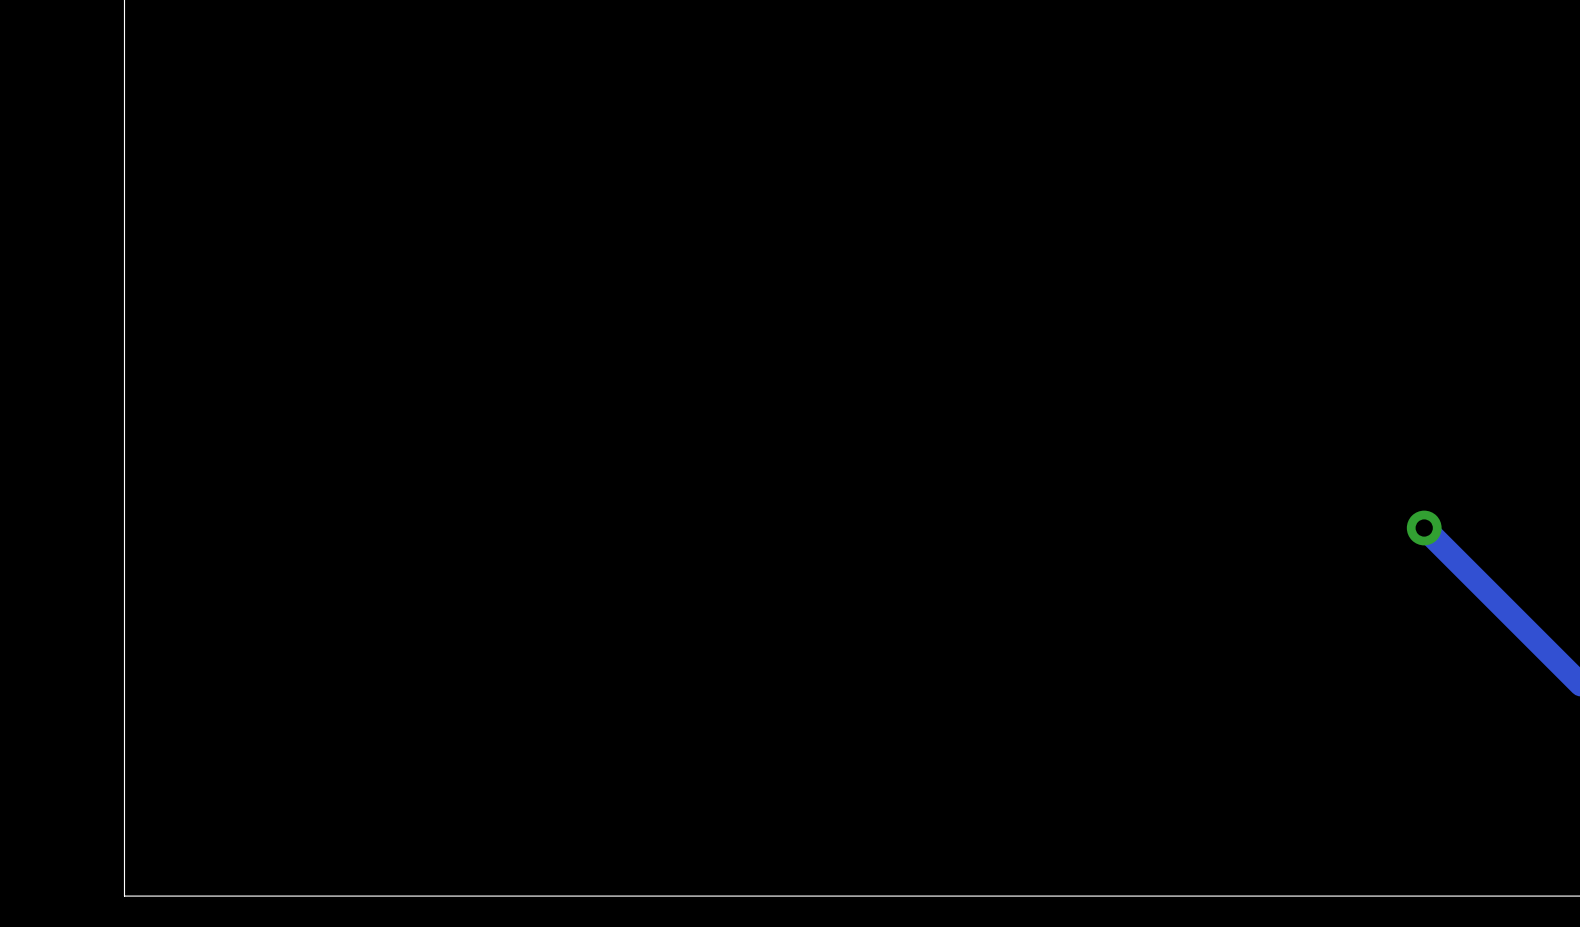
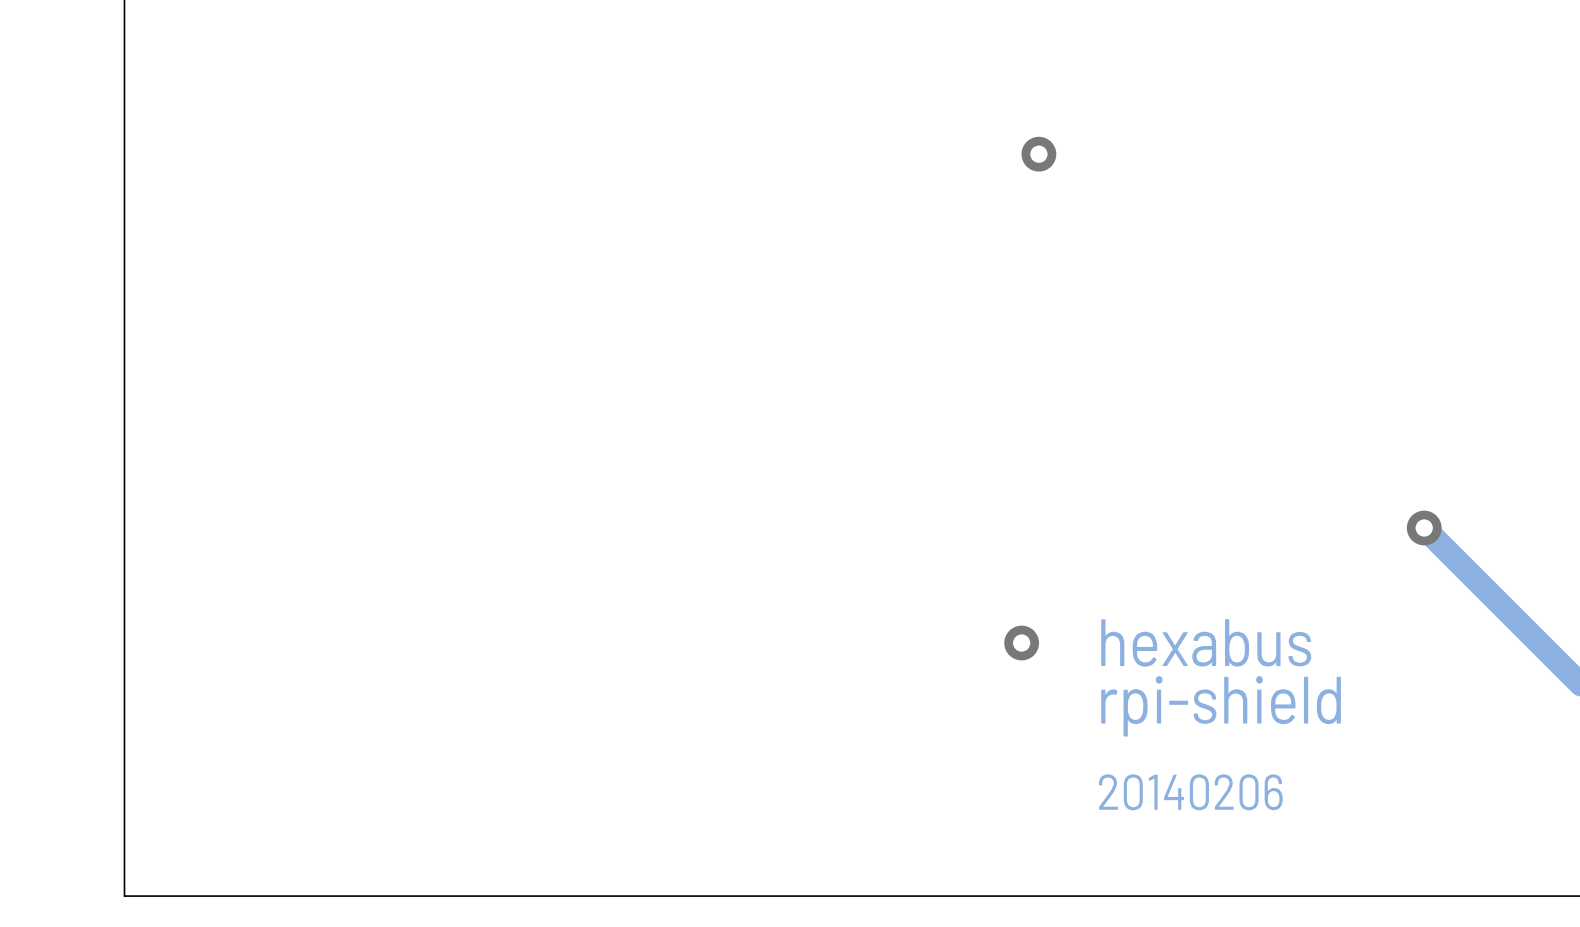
via: none -> (1038, 154)
text: none -> hexabus (1206, 642)
via: none -> (1021, 643)
text: none -> rpi-shield (1221, 706)
text: none -> 20140206 (1190, 792)

